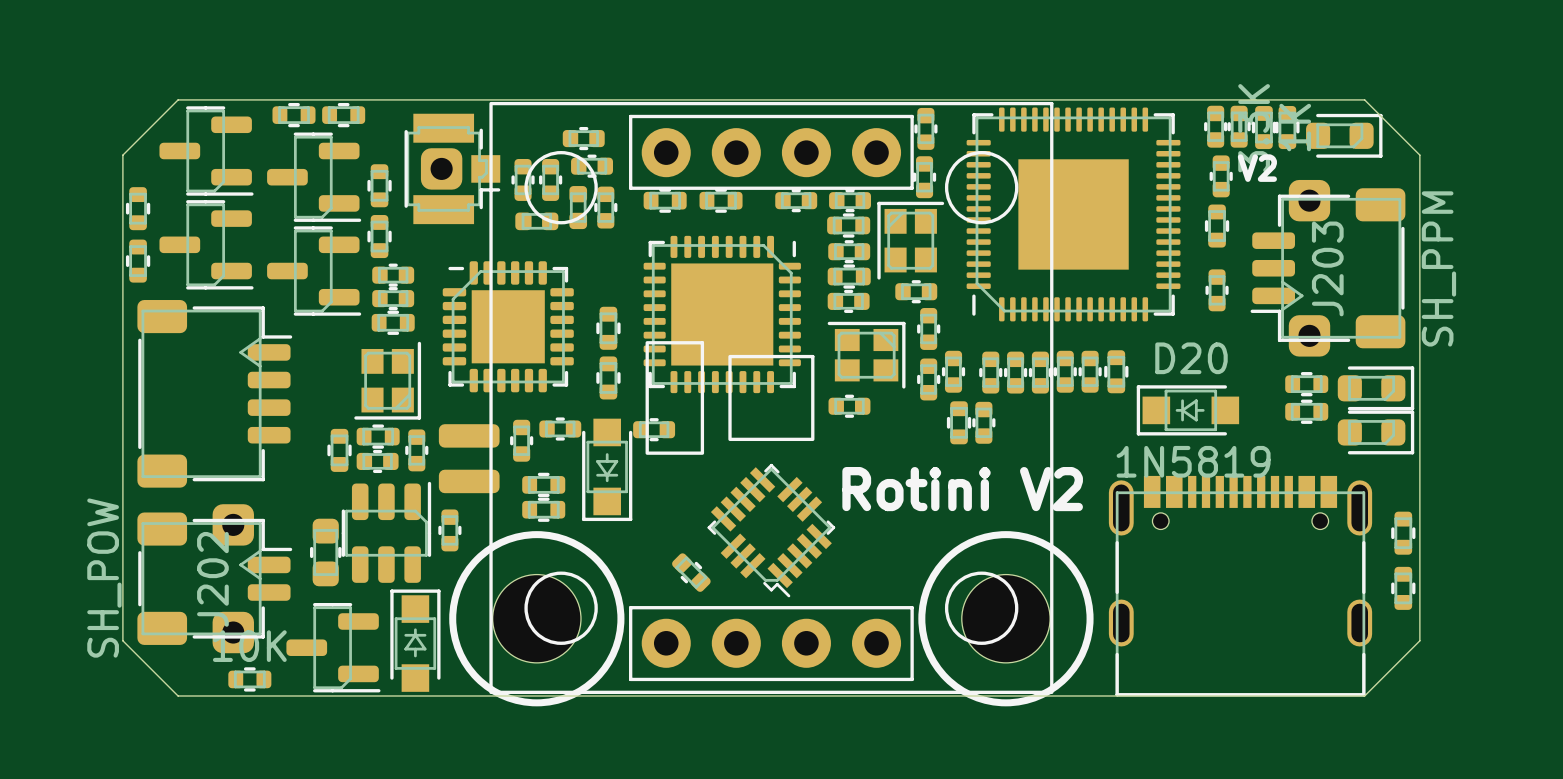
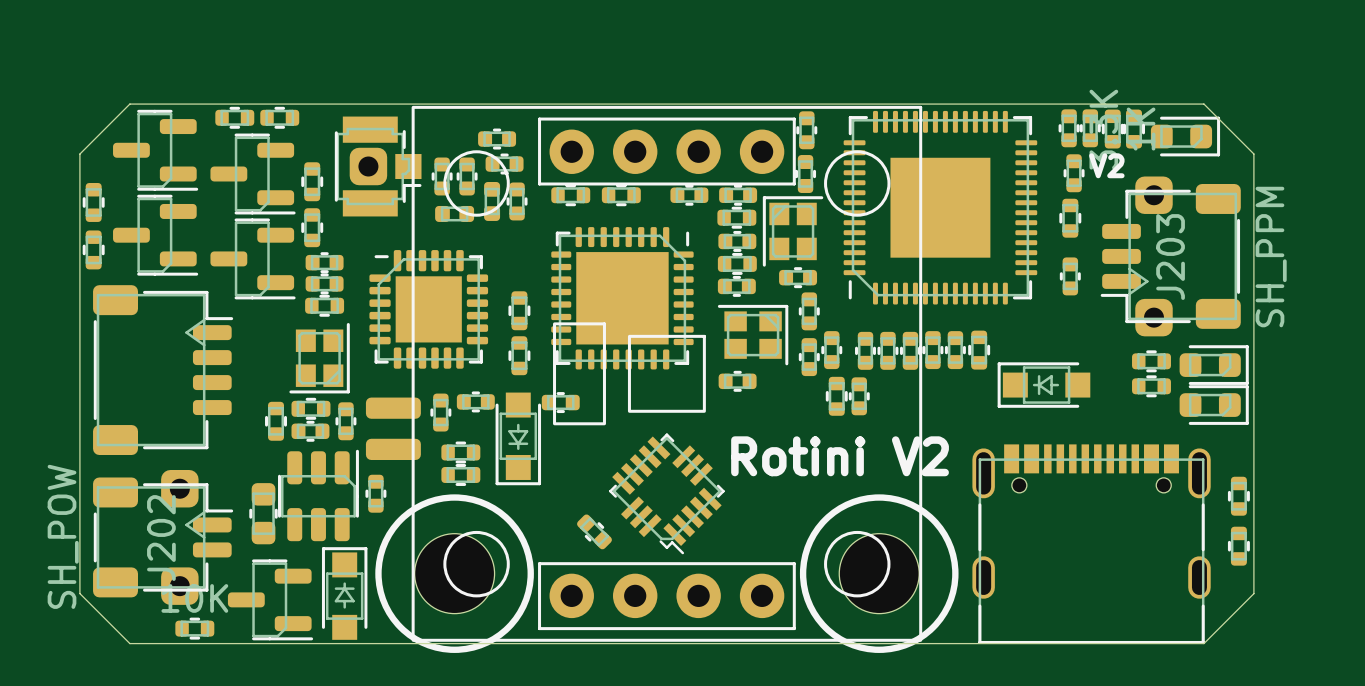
D20 name: D20 (1191, 358) -> none
D20 value: 1N5819 (1193, 461) -> none

